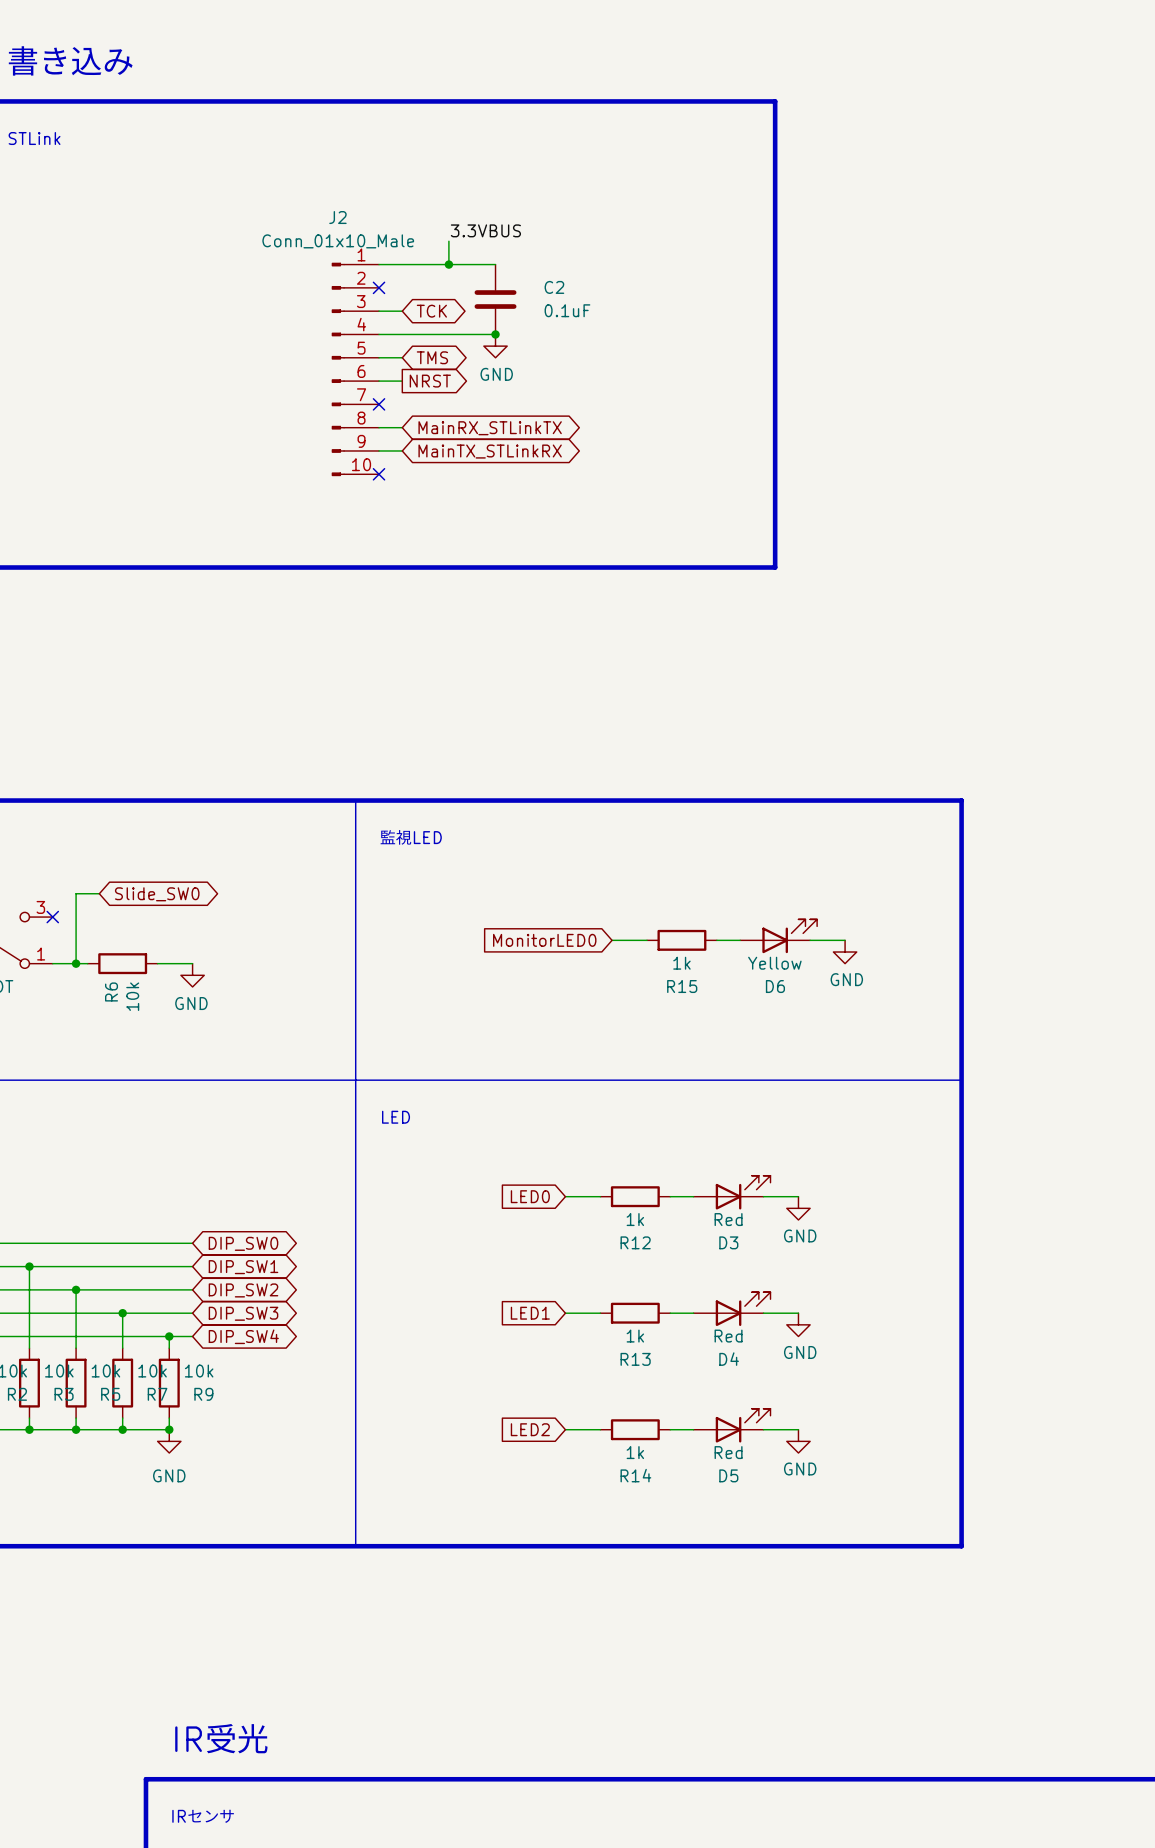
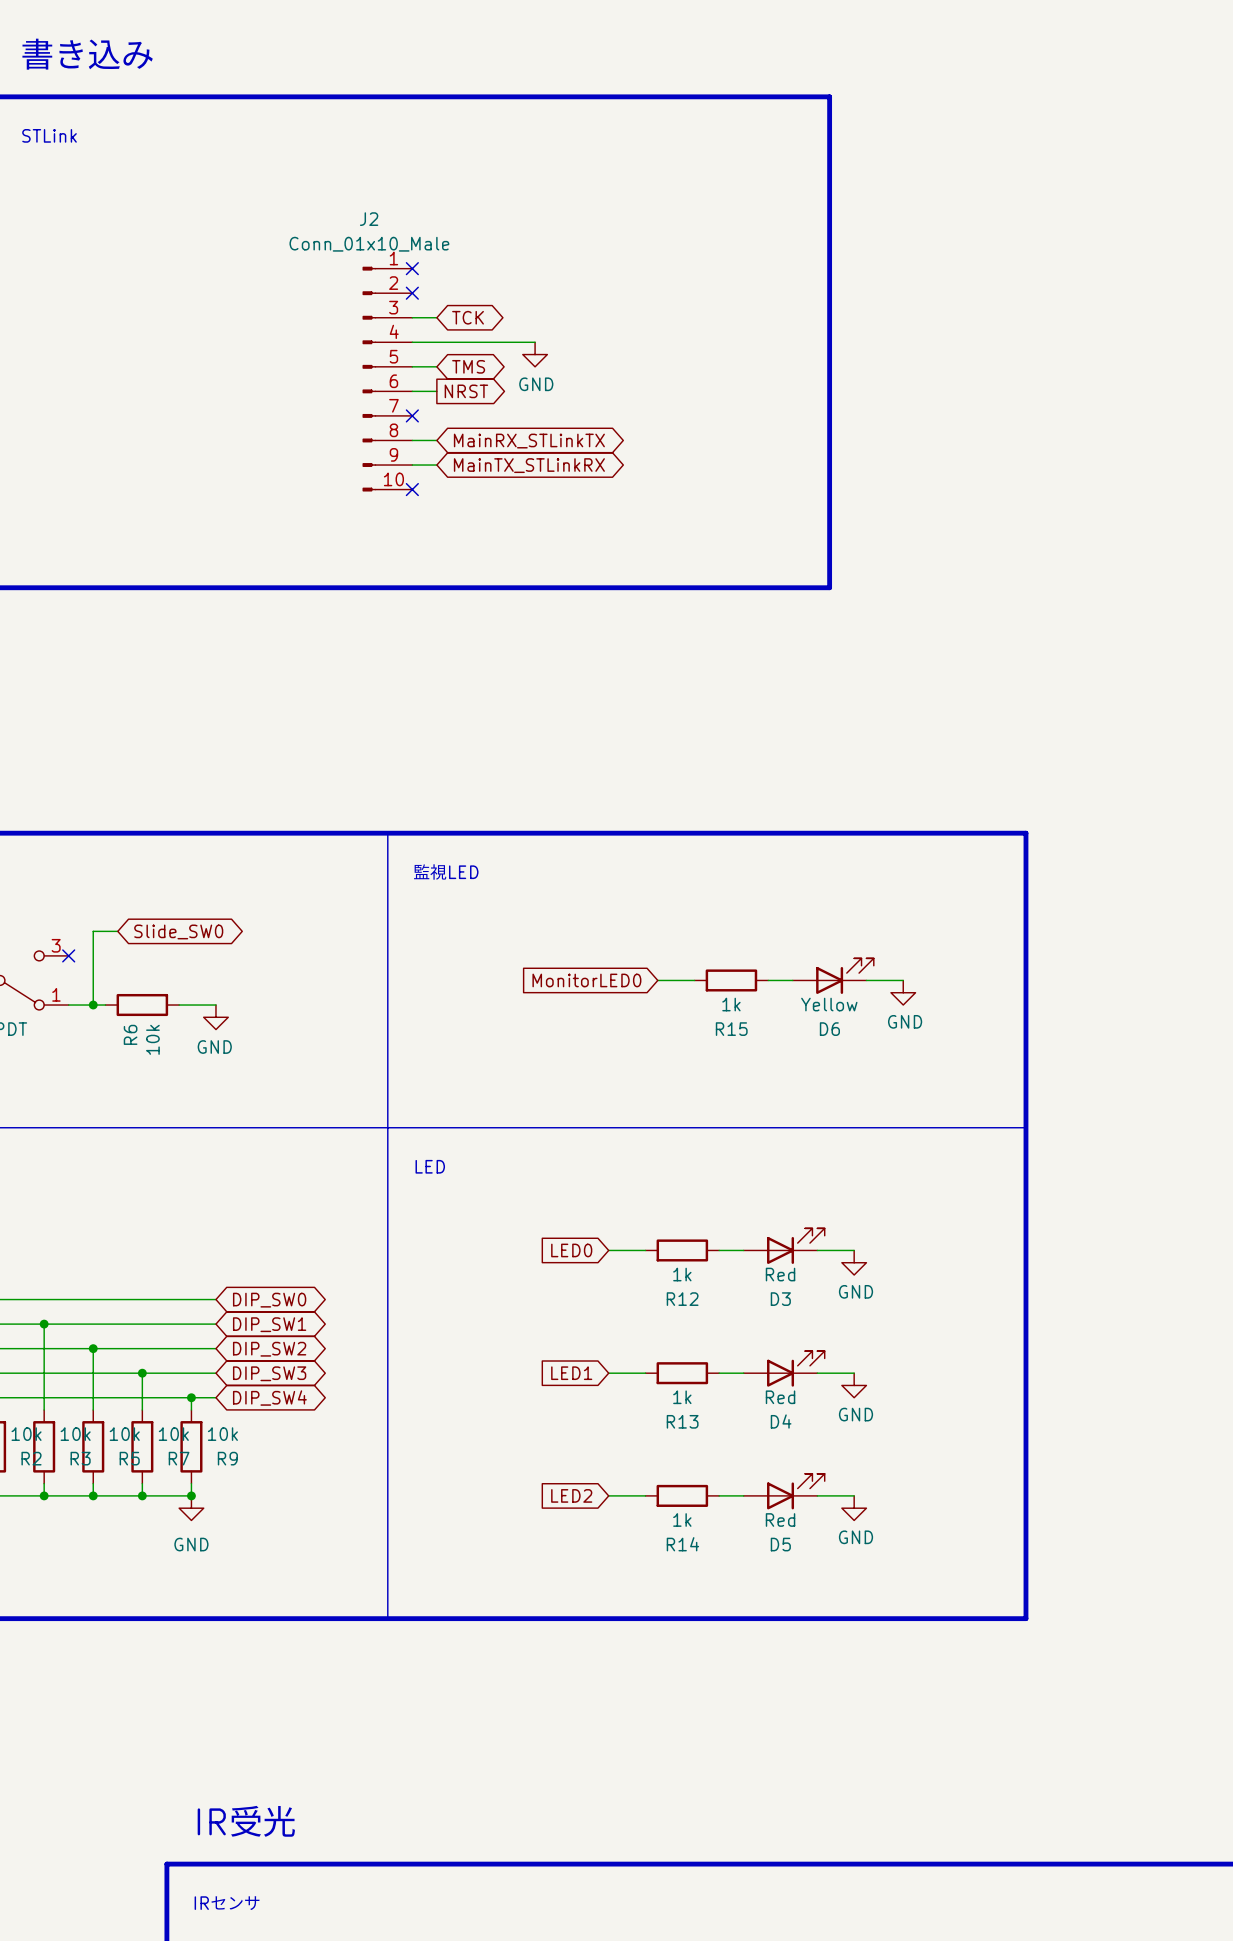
label: 3.3VBUS (485, 230) -> none
wire: (448, 241) (448, 264) -> none
wire: (379, 264) (495, 264) -> none
no-connect mark: none -> (412, 268)
junction: (448, 264) -> none
C2: 0.1uF (495, 299) -> none
junction: (495, 334) -> none

